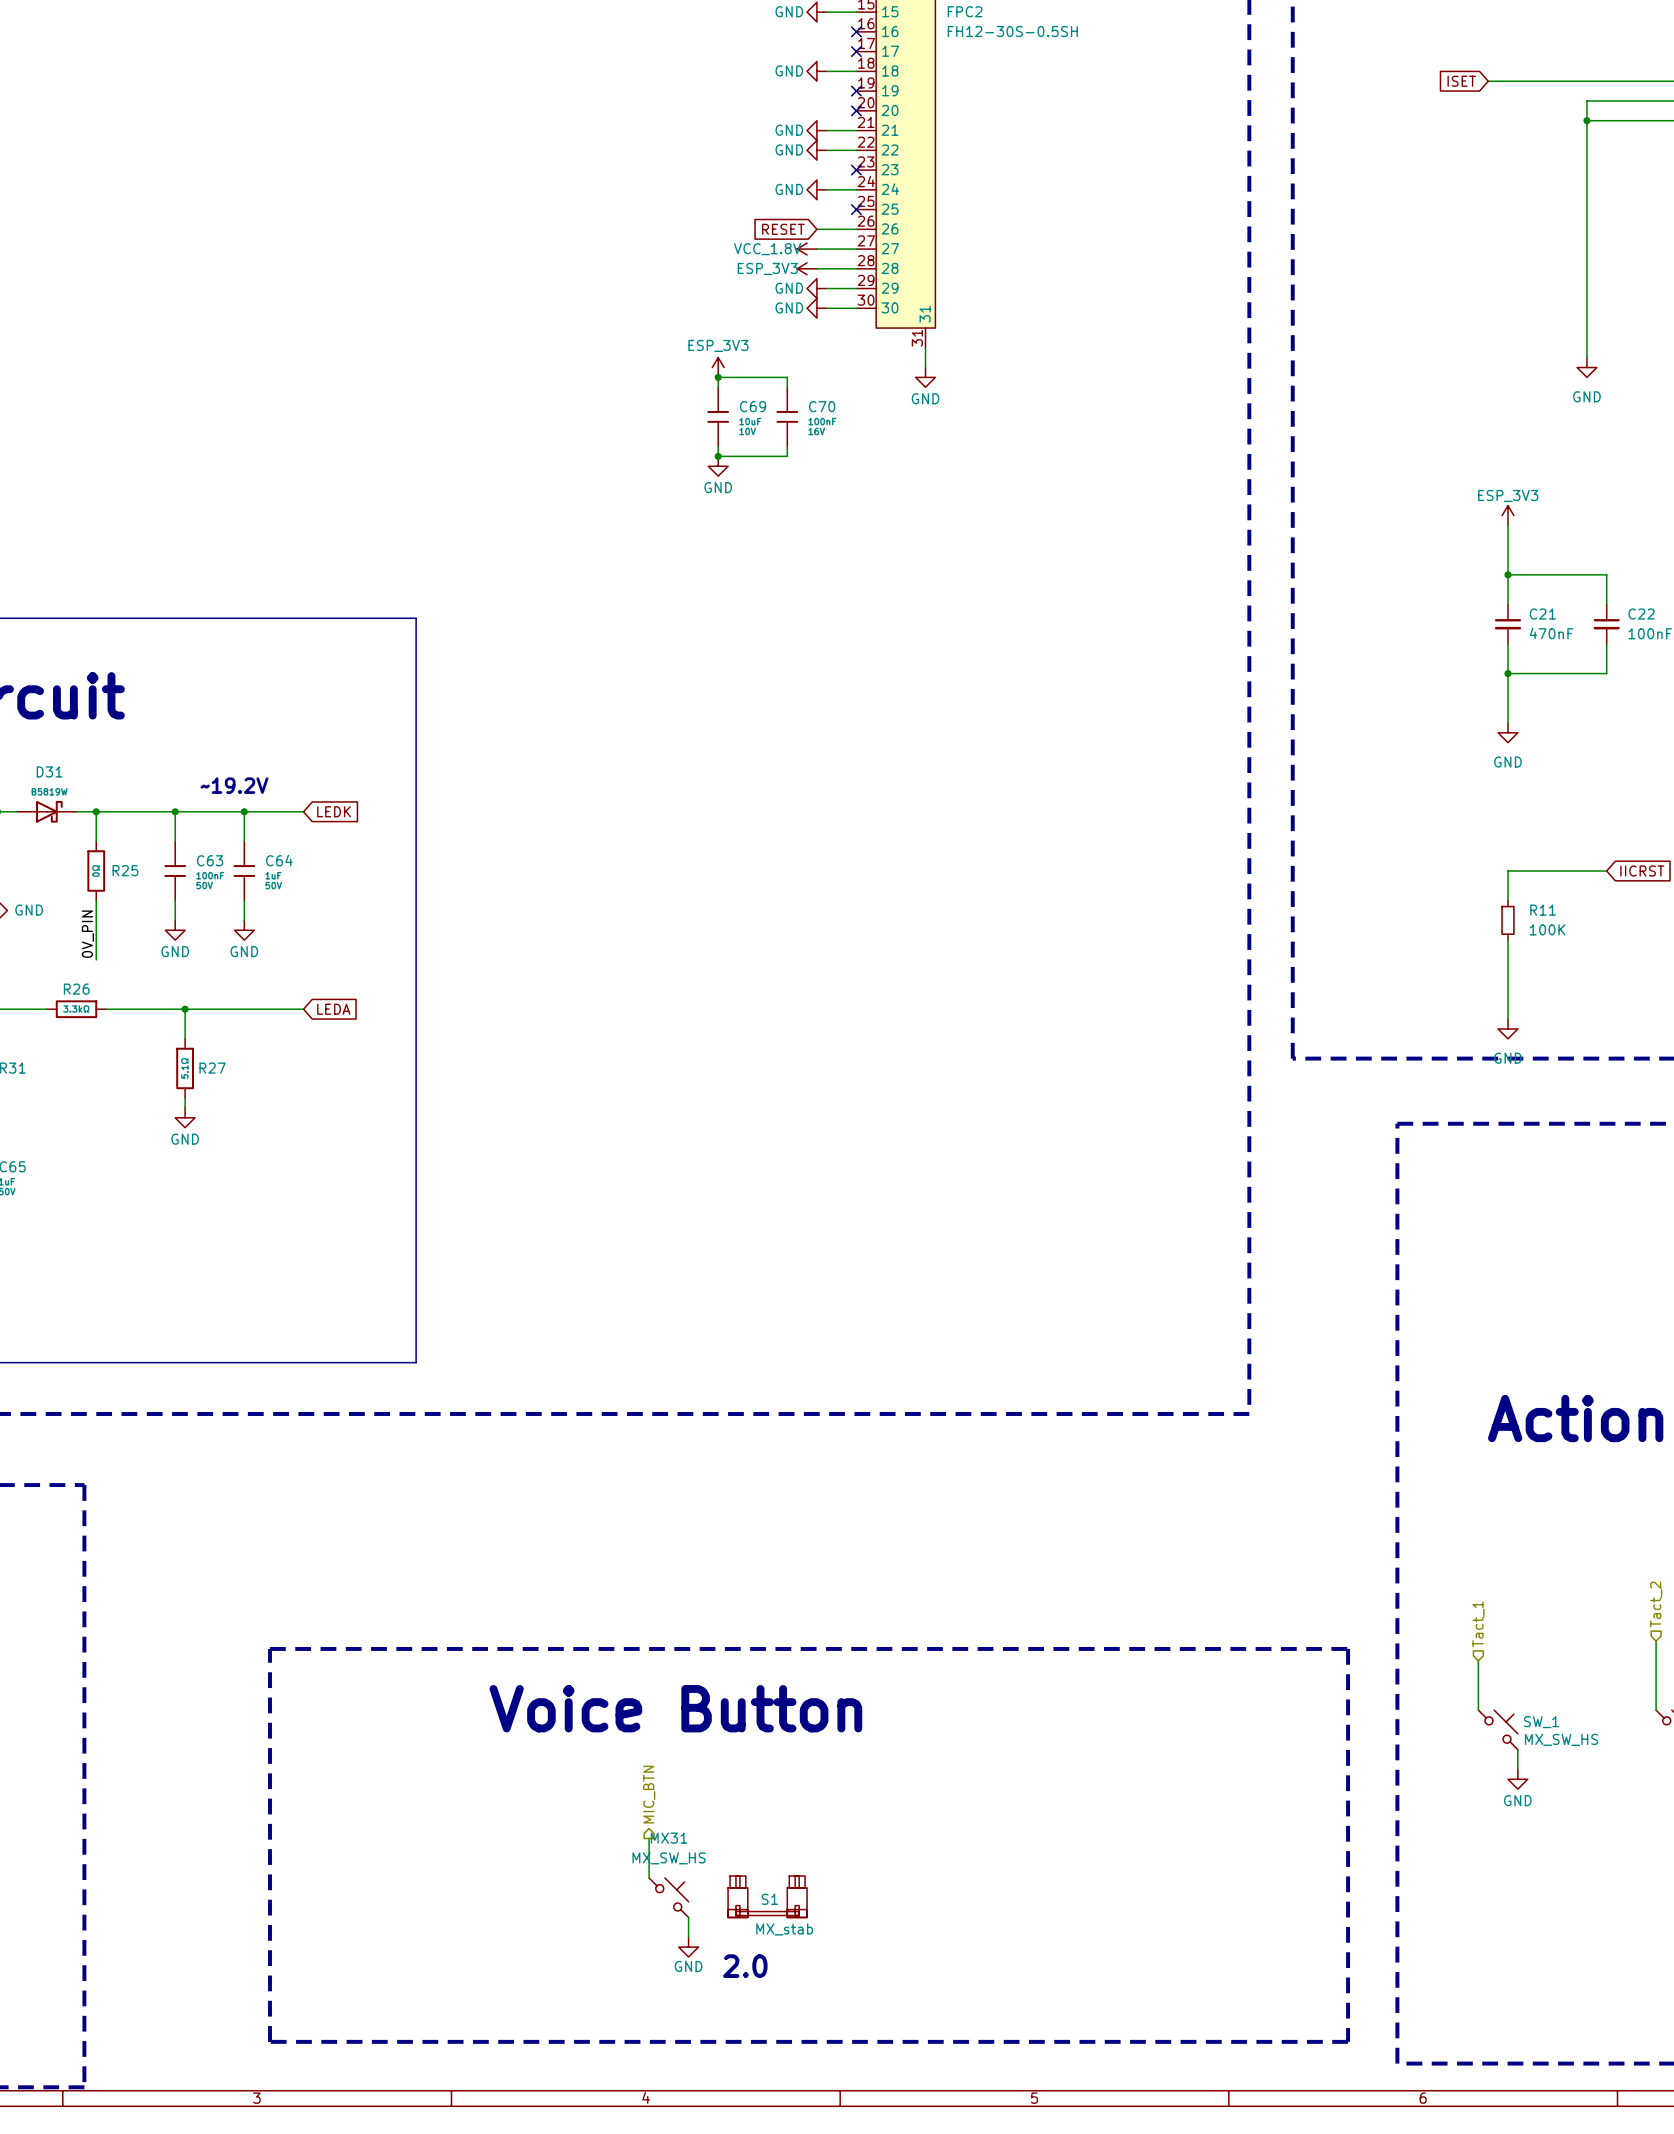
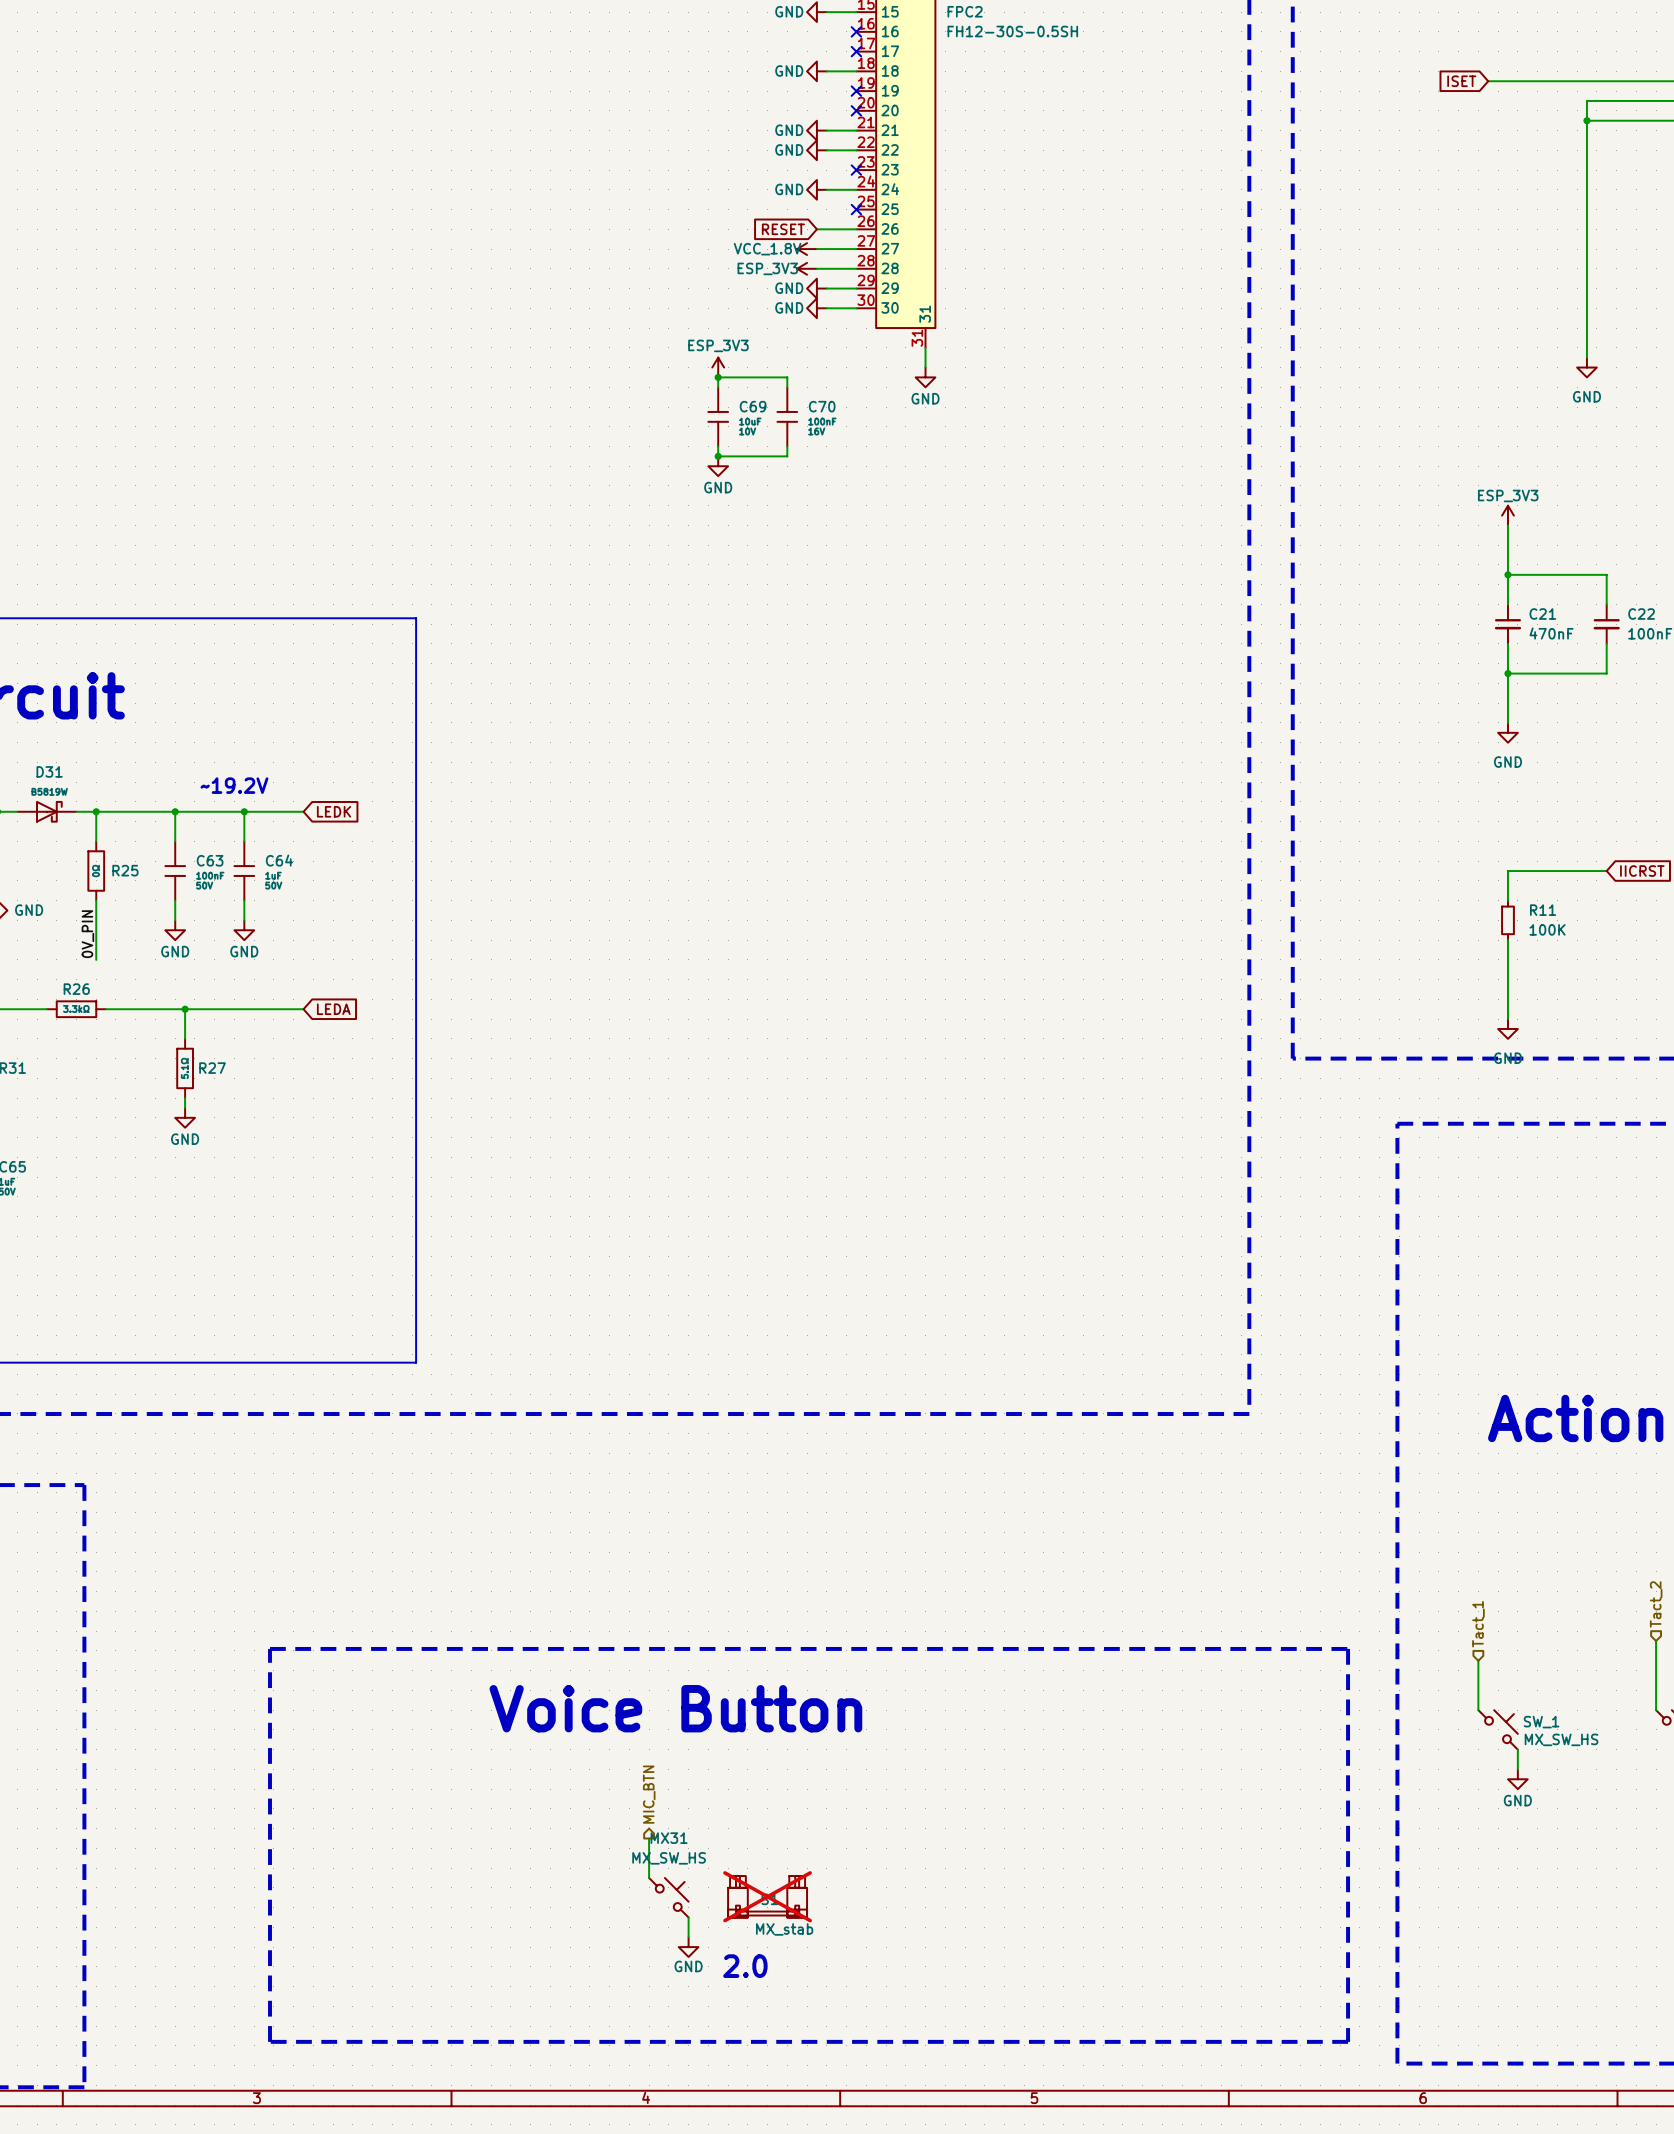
S1 do-not-place cross: none -> (767, 1896)

